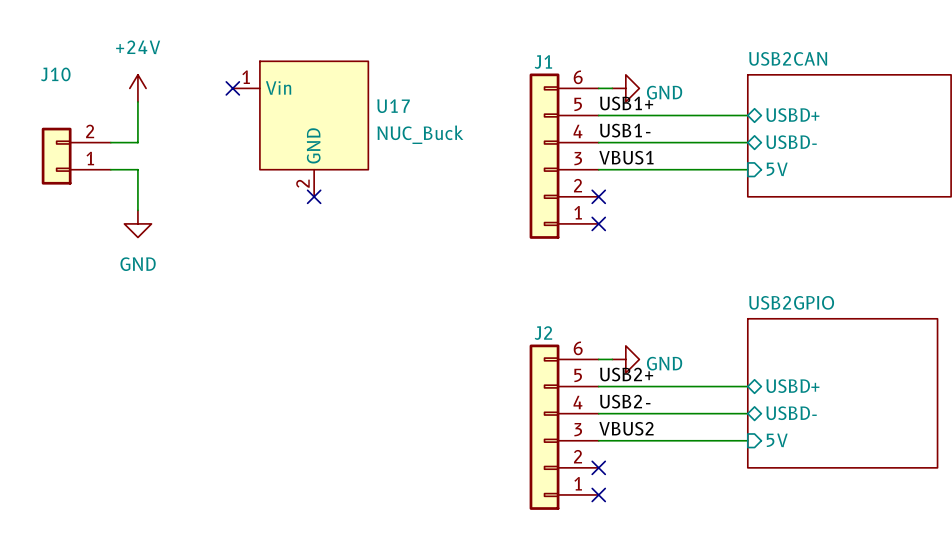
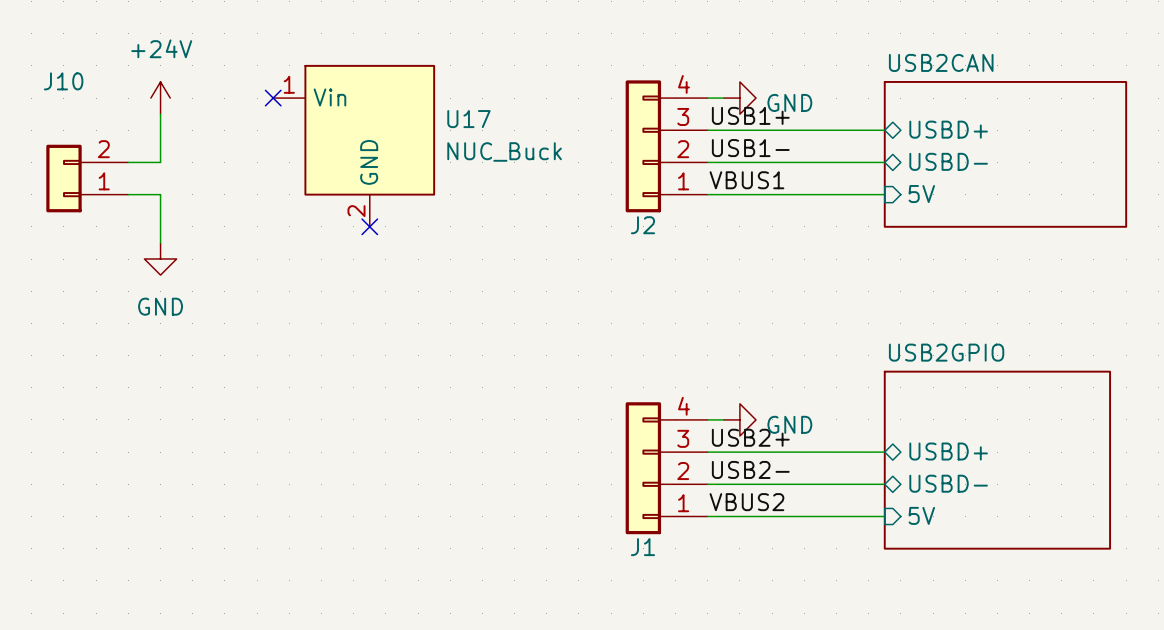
J1 name position: J1 (543, 62) -> J1 (642, 547)
J1 symbol: [529, 73, 599, 239] -> [625, 402, 708, 535]
no-connect mark: (598, 196) -> none
no-connect mark: (598, 223) -> none
J2 name position: J2 (543, 333) -> J2 (642, 225)
J2 symbol: [529, 344, 599, 510] -> [625, 80, 708, 213]
no-connect mark: (598, 467) -> none
no-connect mark: (598, 494) -> none

